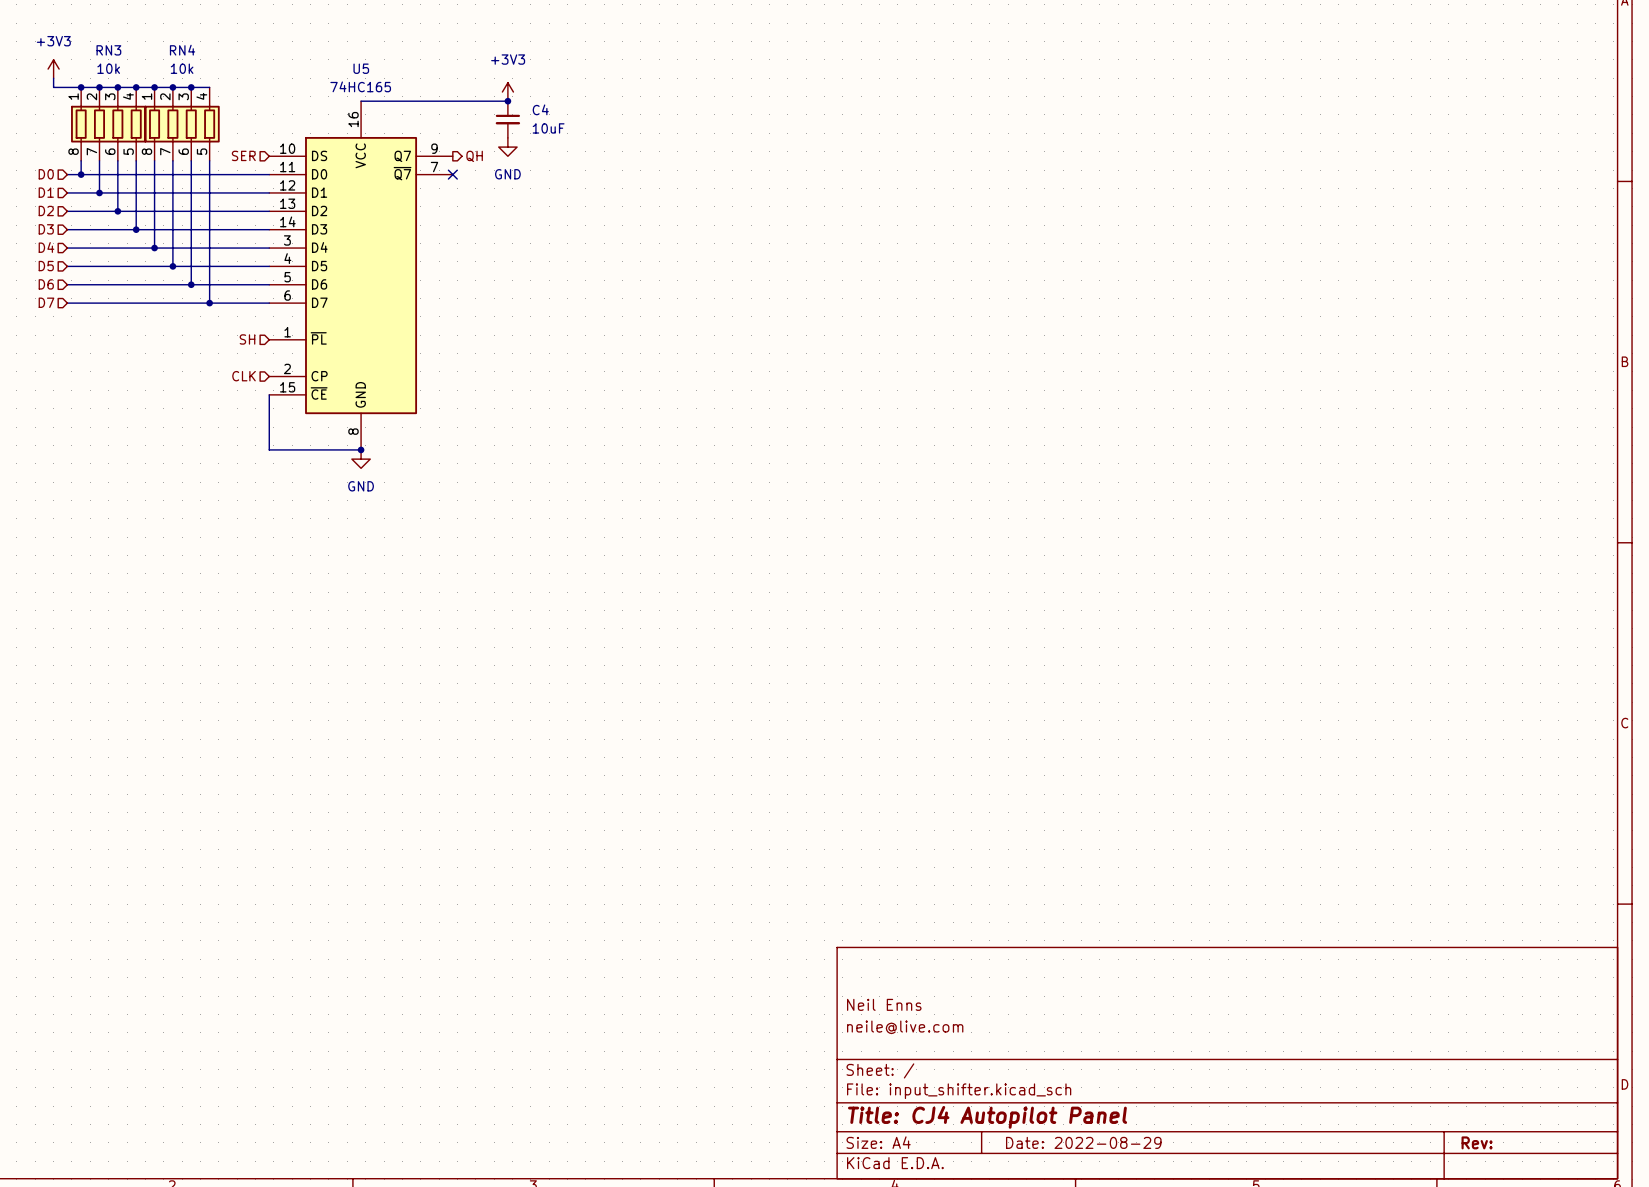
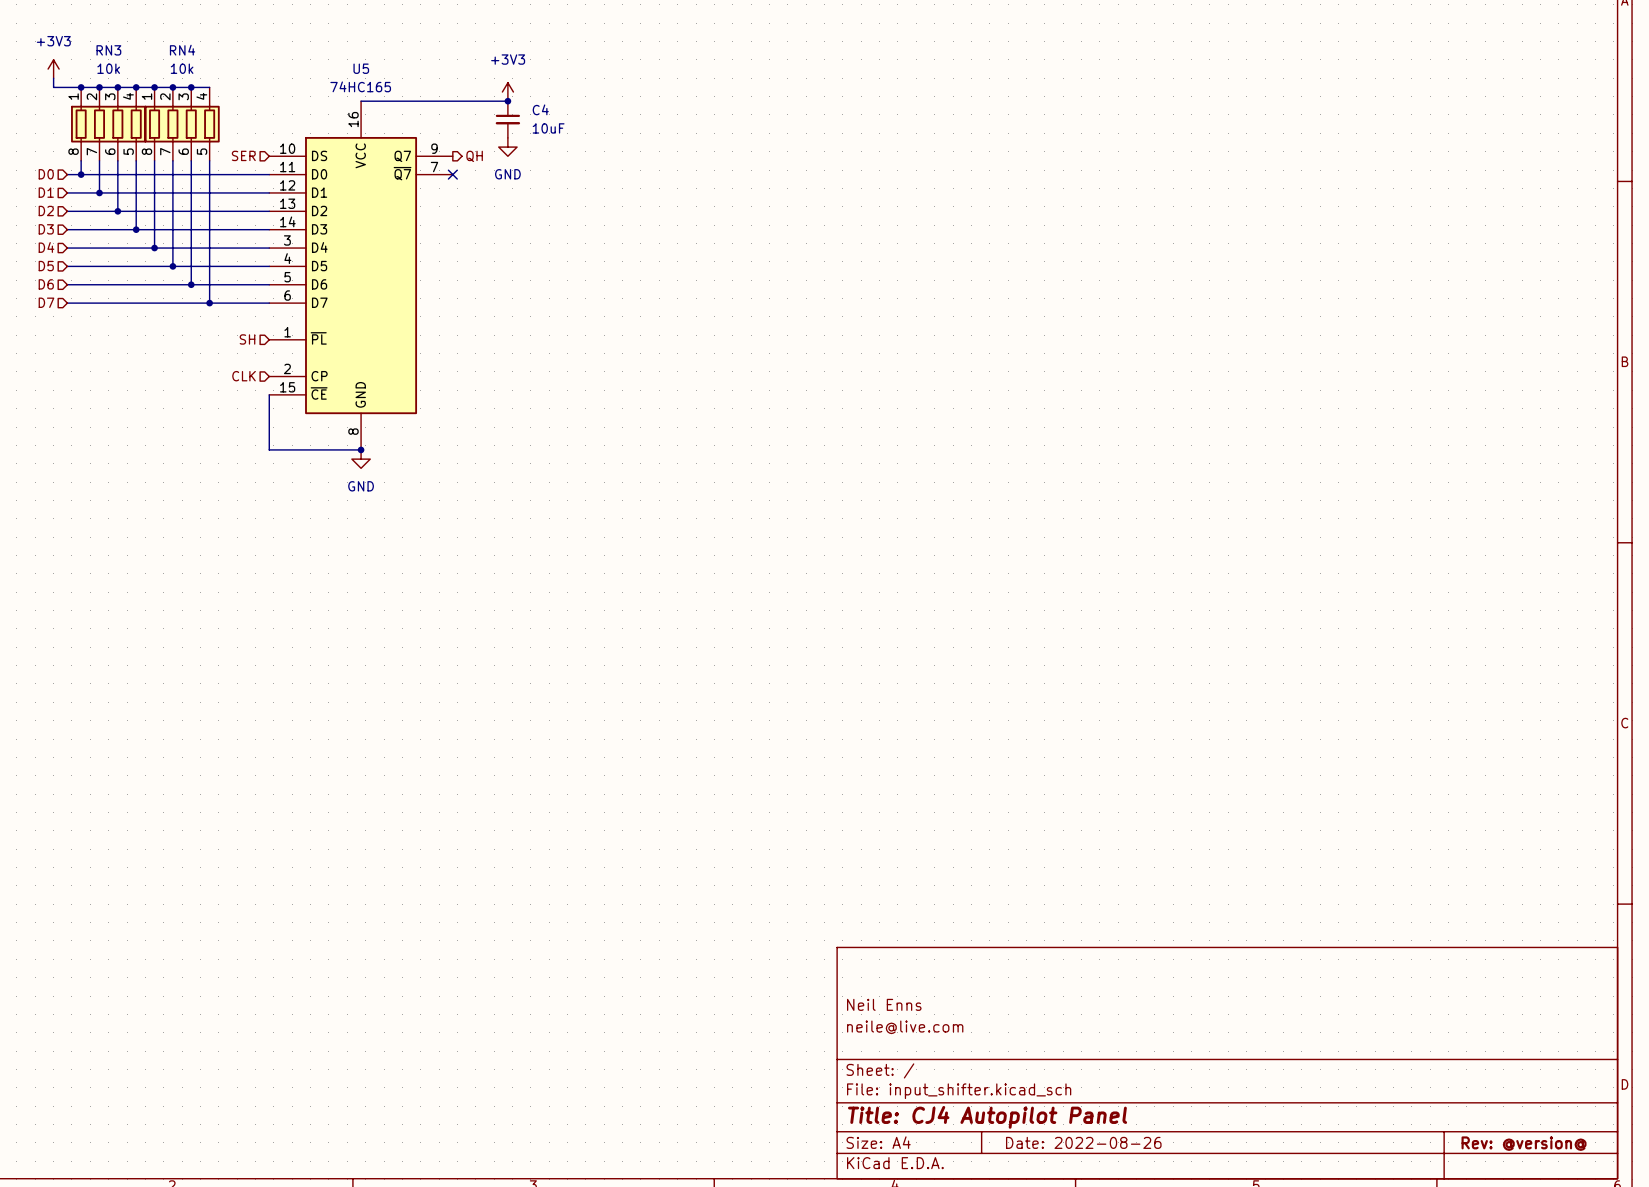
title block: Date: 2022-08-29 (1083, 1142) -> Date: 2022-08-26 (1083, 1142)
title block: Rev: (1477, 1142) -> Rev: @version@ (1524, 1143)

